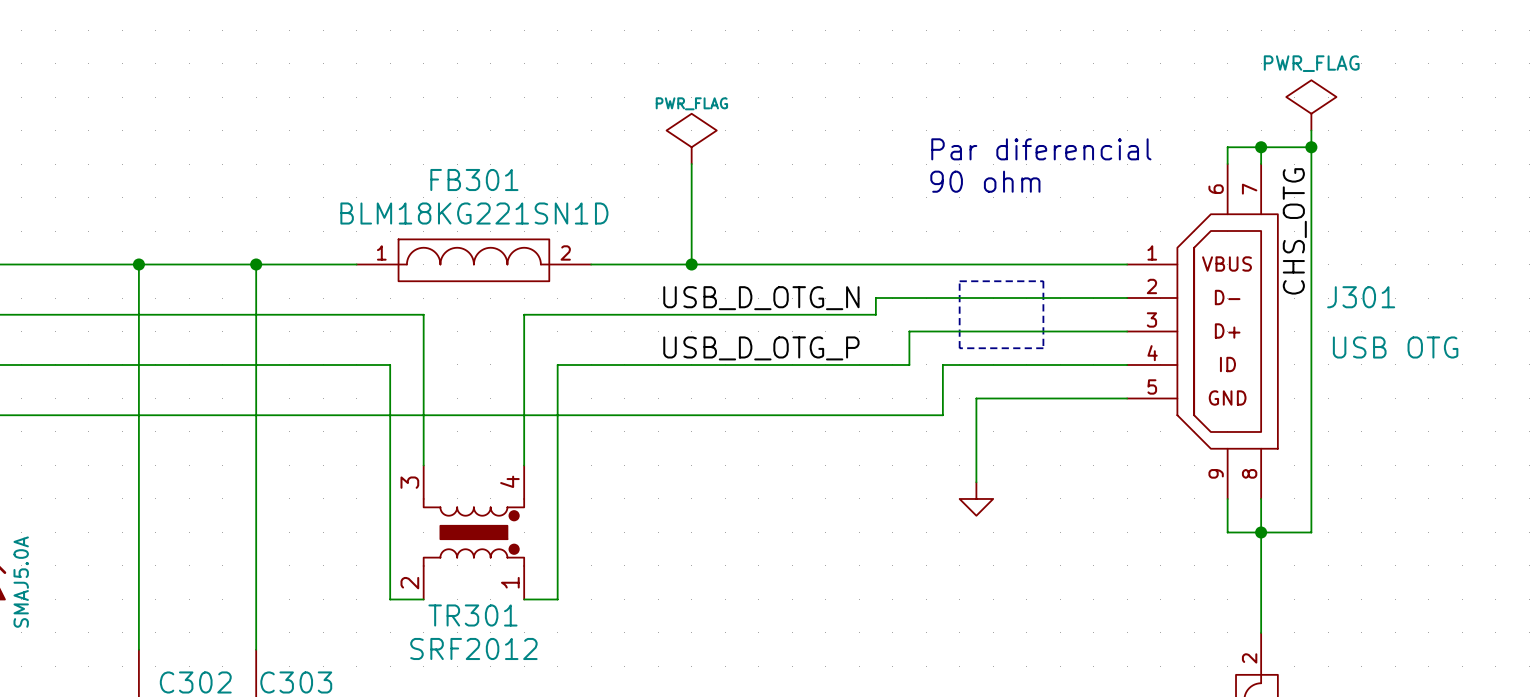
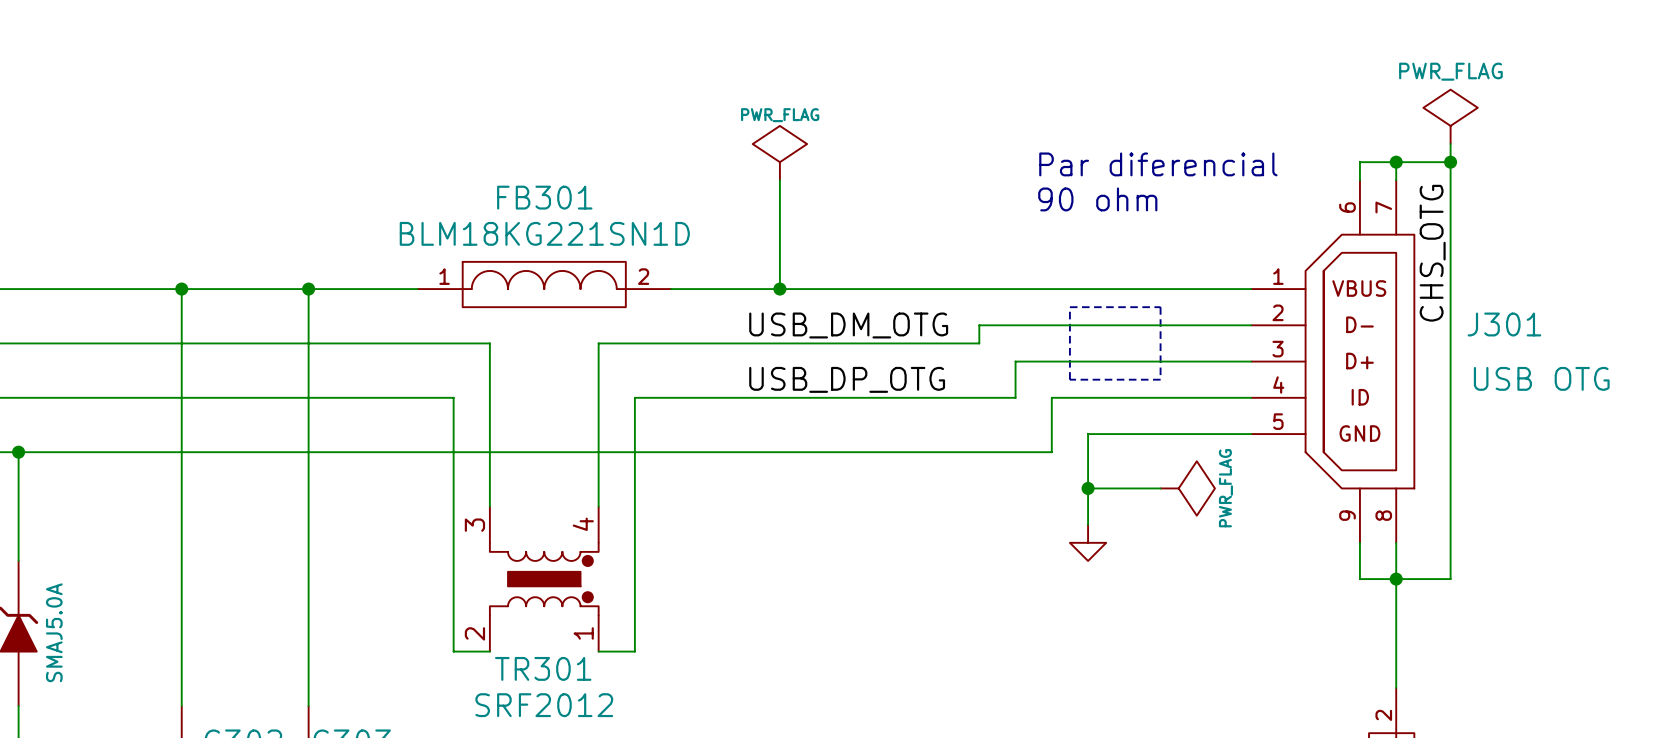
label: USB_D_OTG_N (761, 298) -> USB_DM_OTG (848, 325)
label: USB_D_OTG_P (761, 348) -> USB_DP_OTG (847, 379)
wire: none -> (1088, 488) (1160, 488)
junction: none -> (1088, 488)
power symbol: none -> PWR_FLAG (1187, 488)

